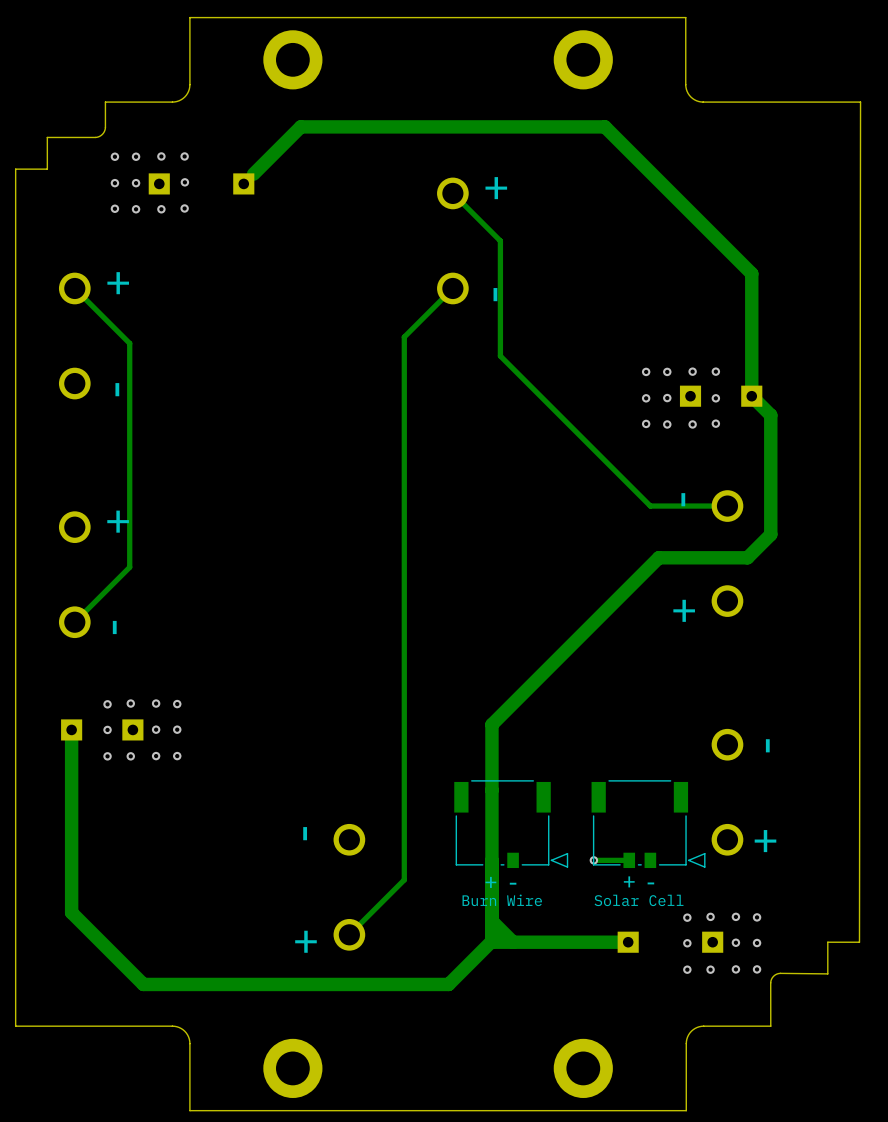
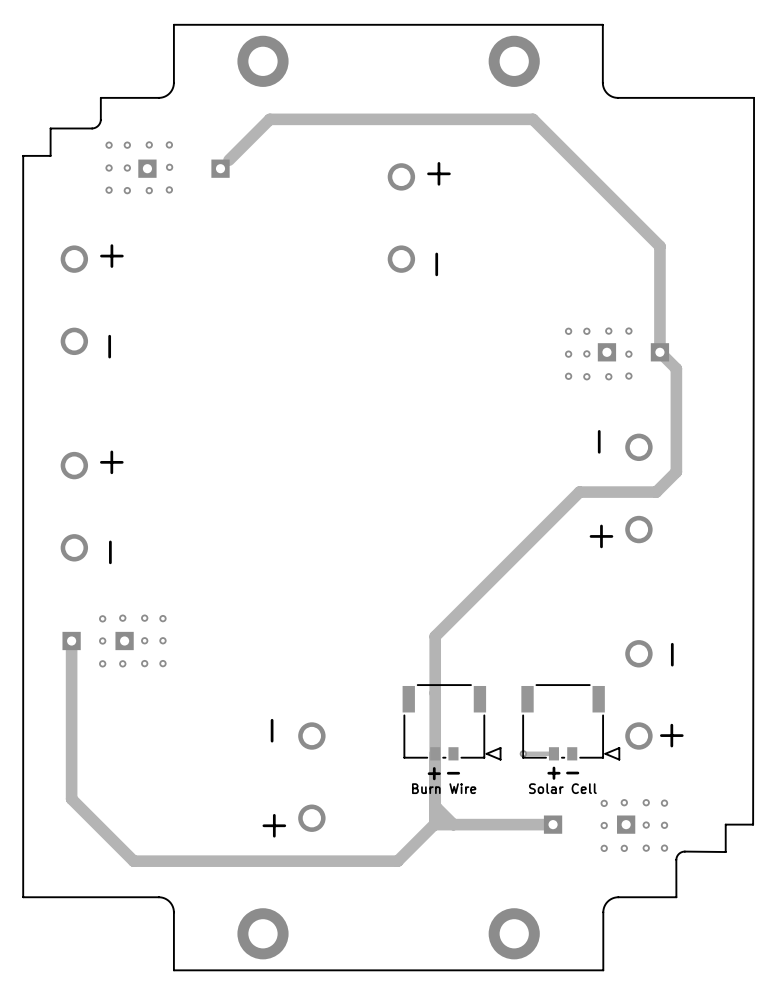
track: (452, 193) (500, 240) (500, 356) (650, 506) (727, 506) -> none
track: (74, 288) (129, 343) (129, 567) (74, 622) -> none
track: (452, 288) (404, 337) (404, 879) (349, 934) -> none

